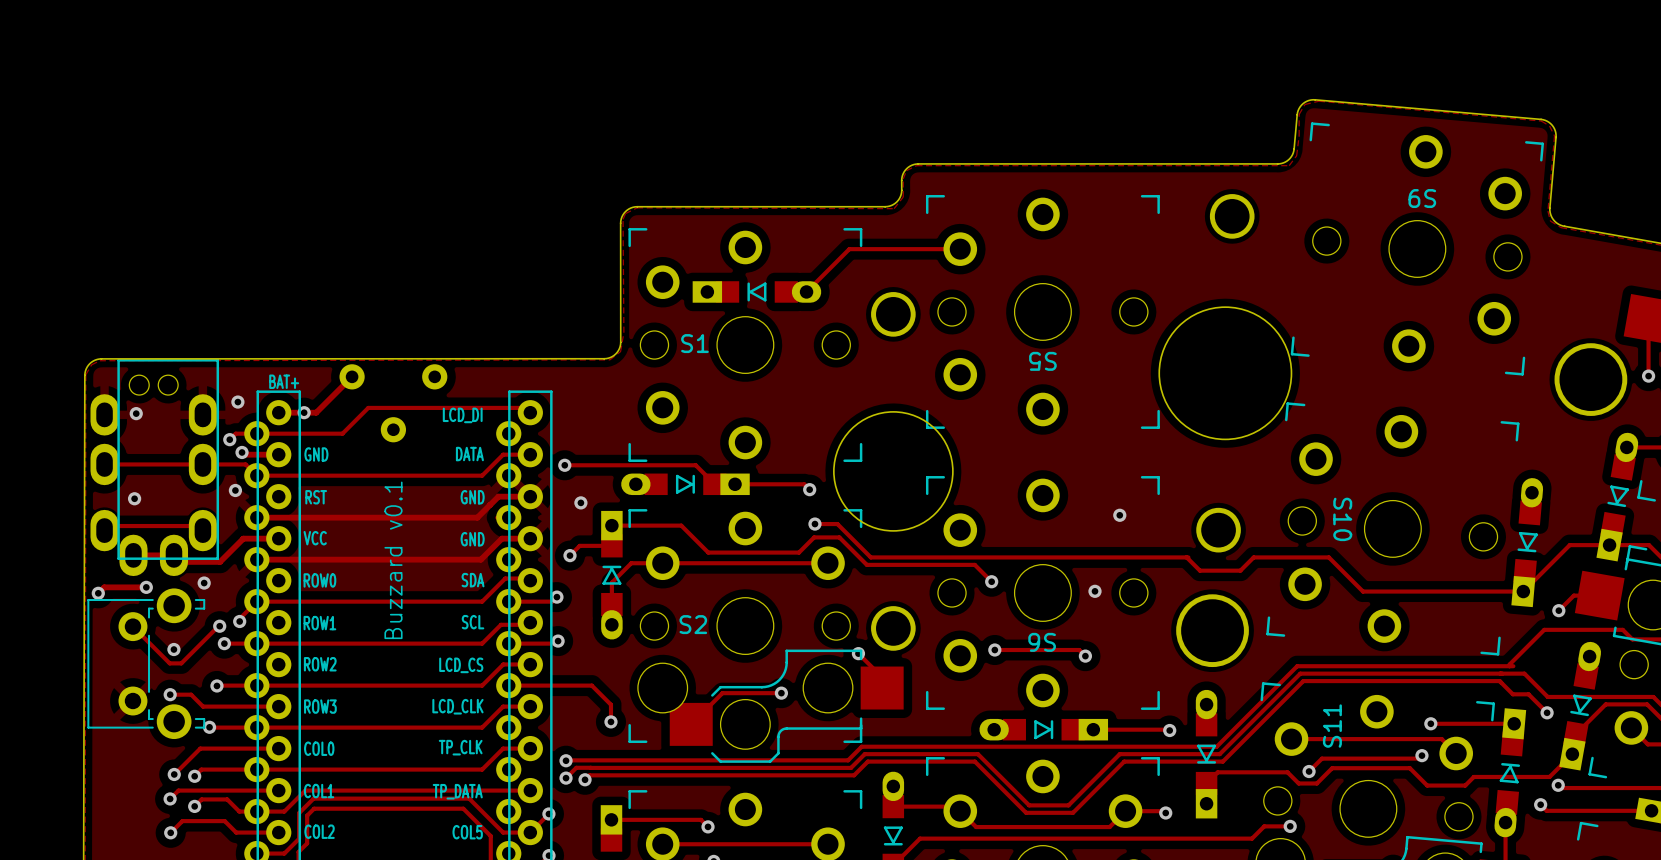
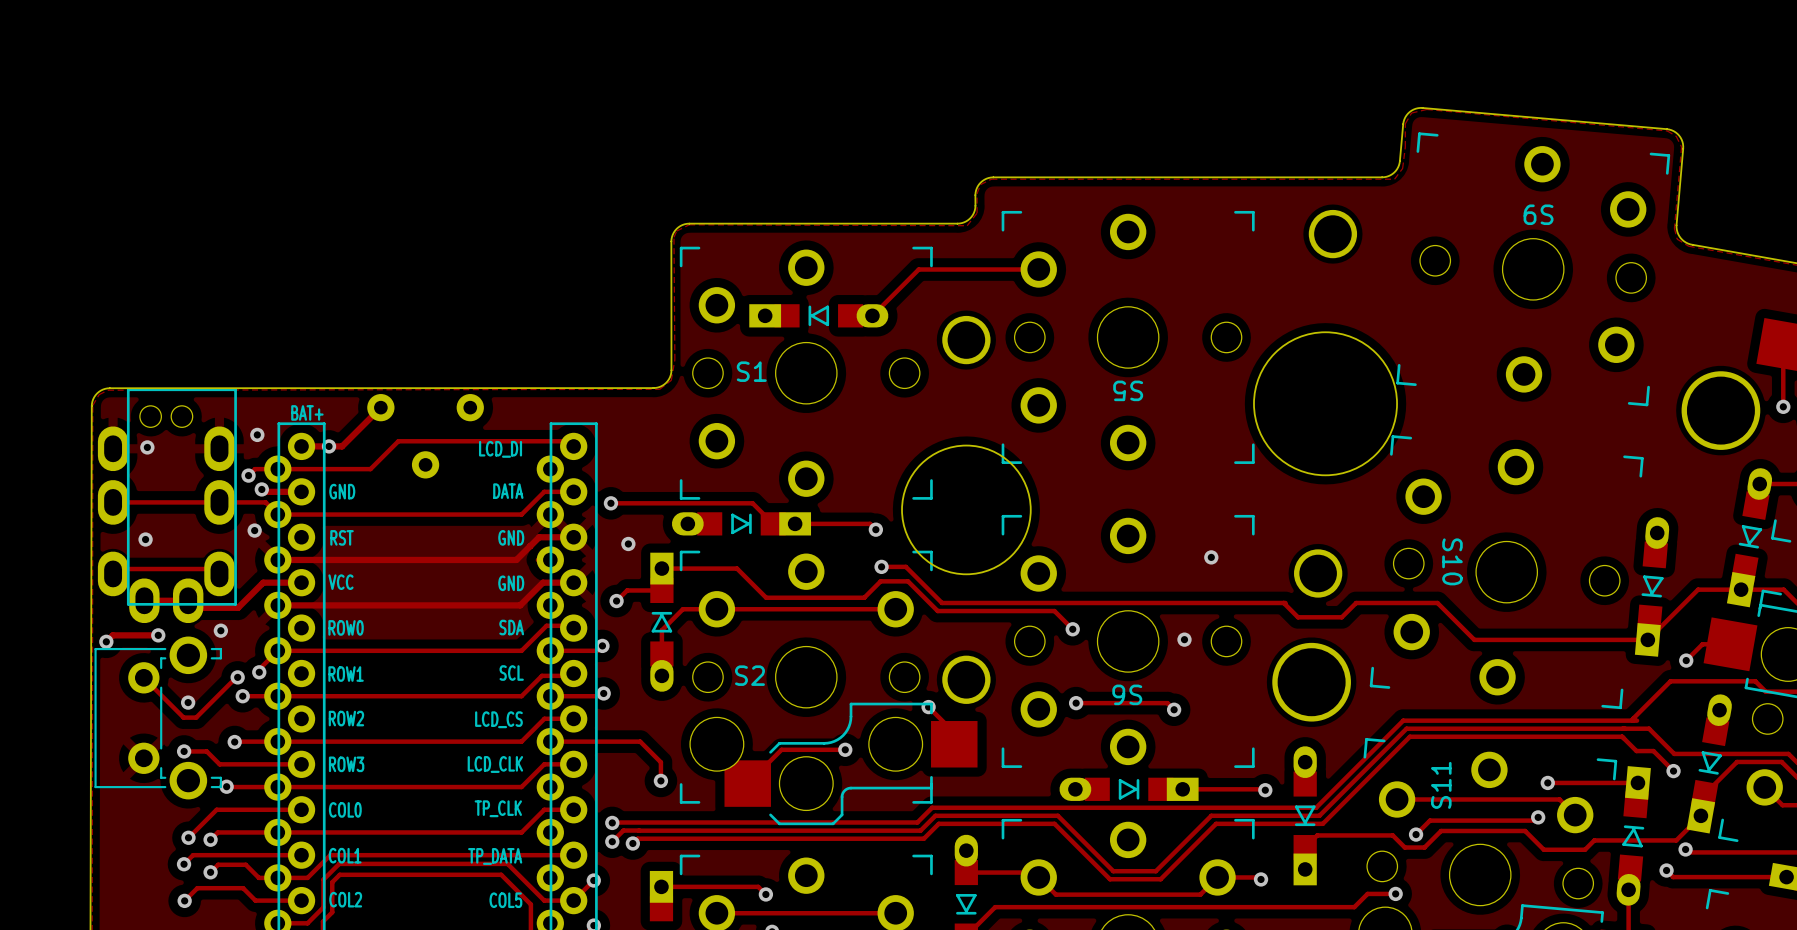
text: Buzzard v0.1 (393, 560) -> none

